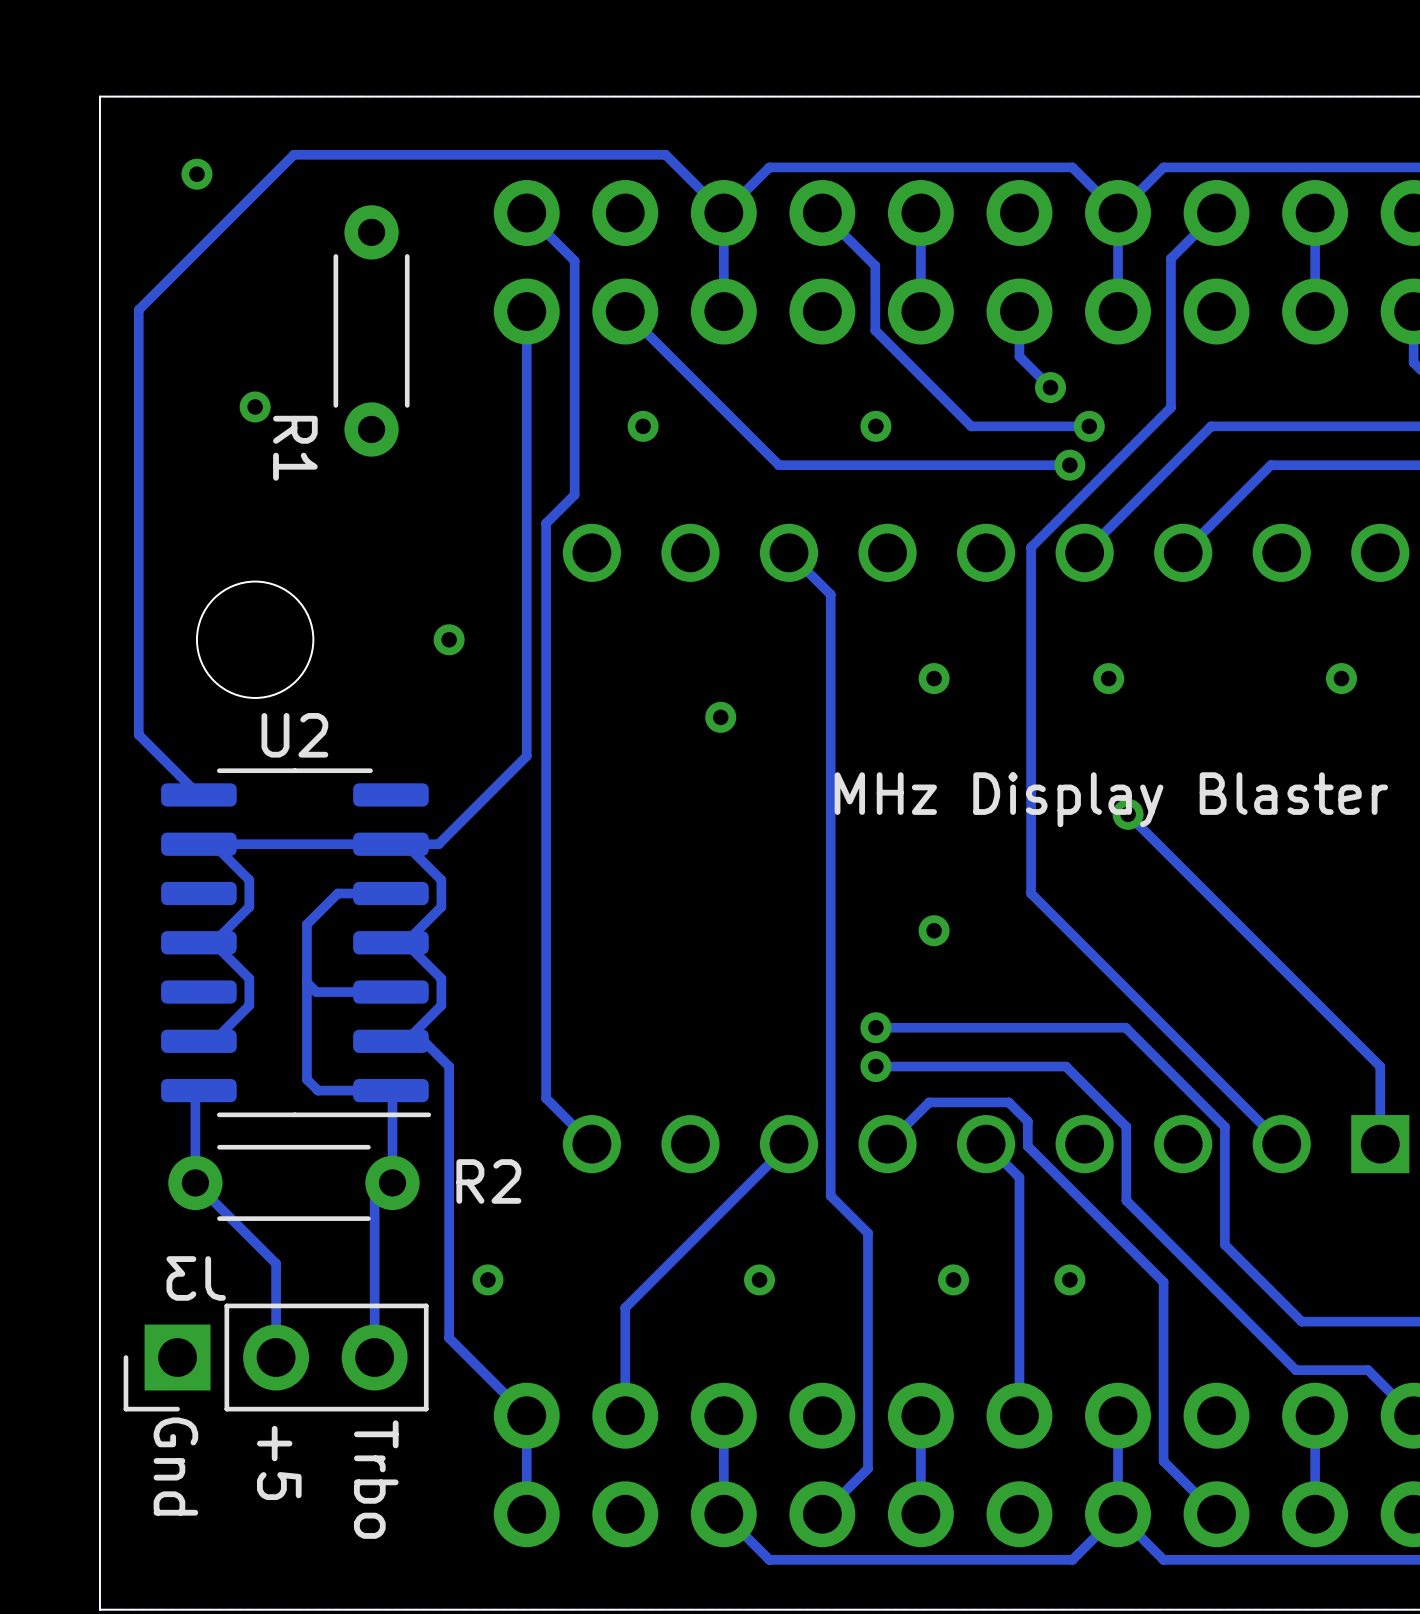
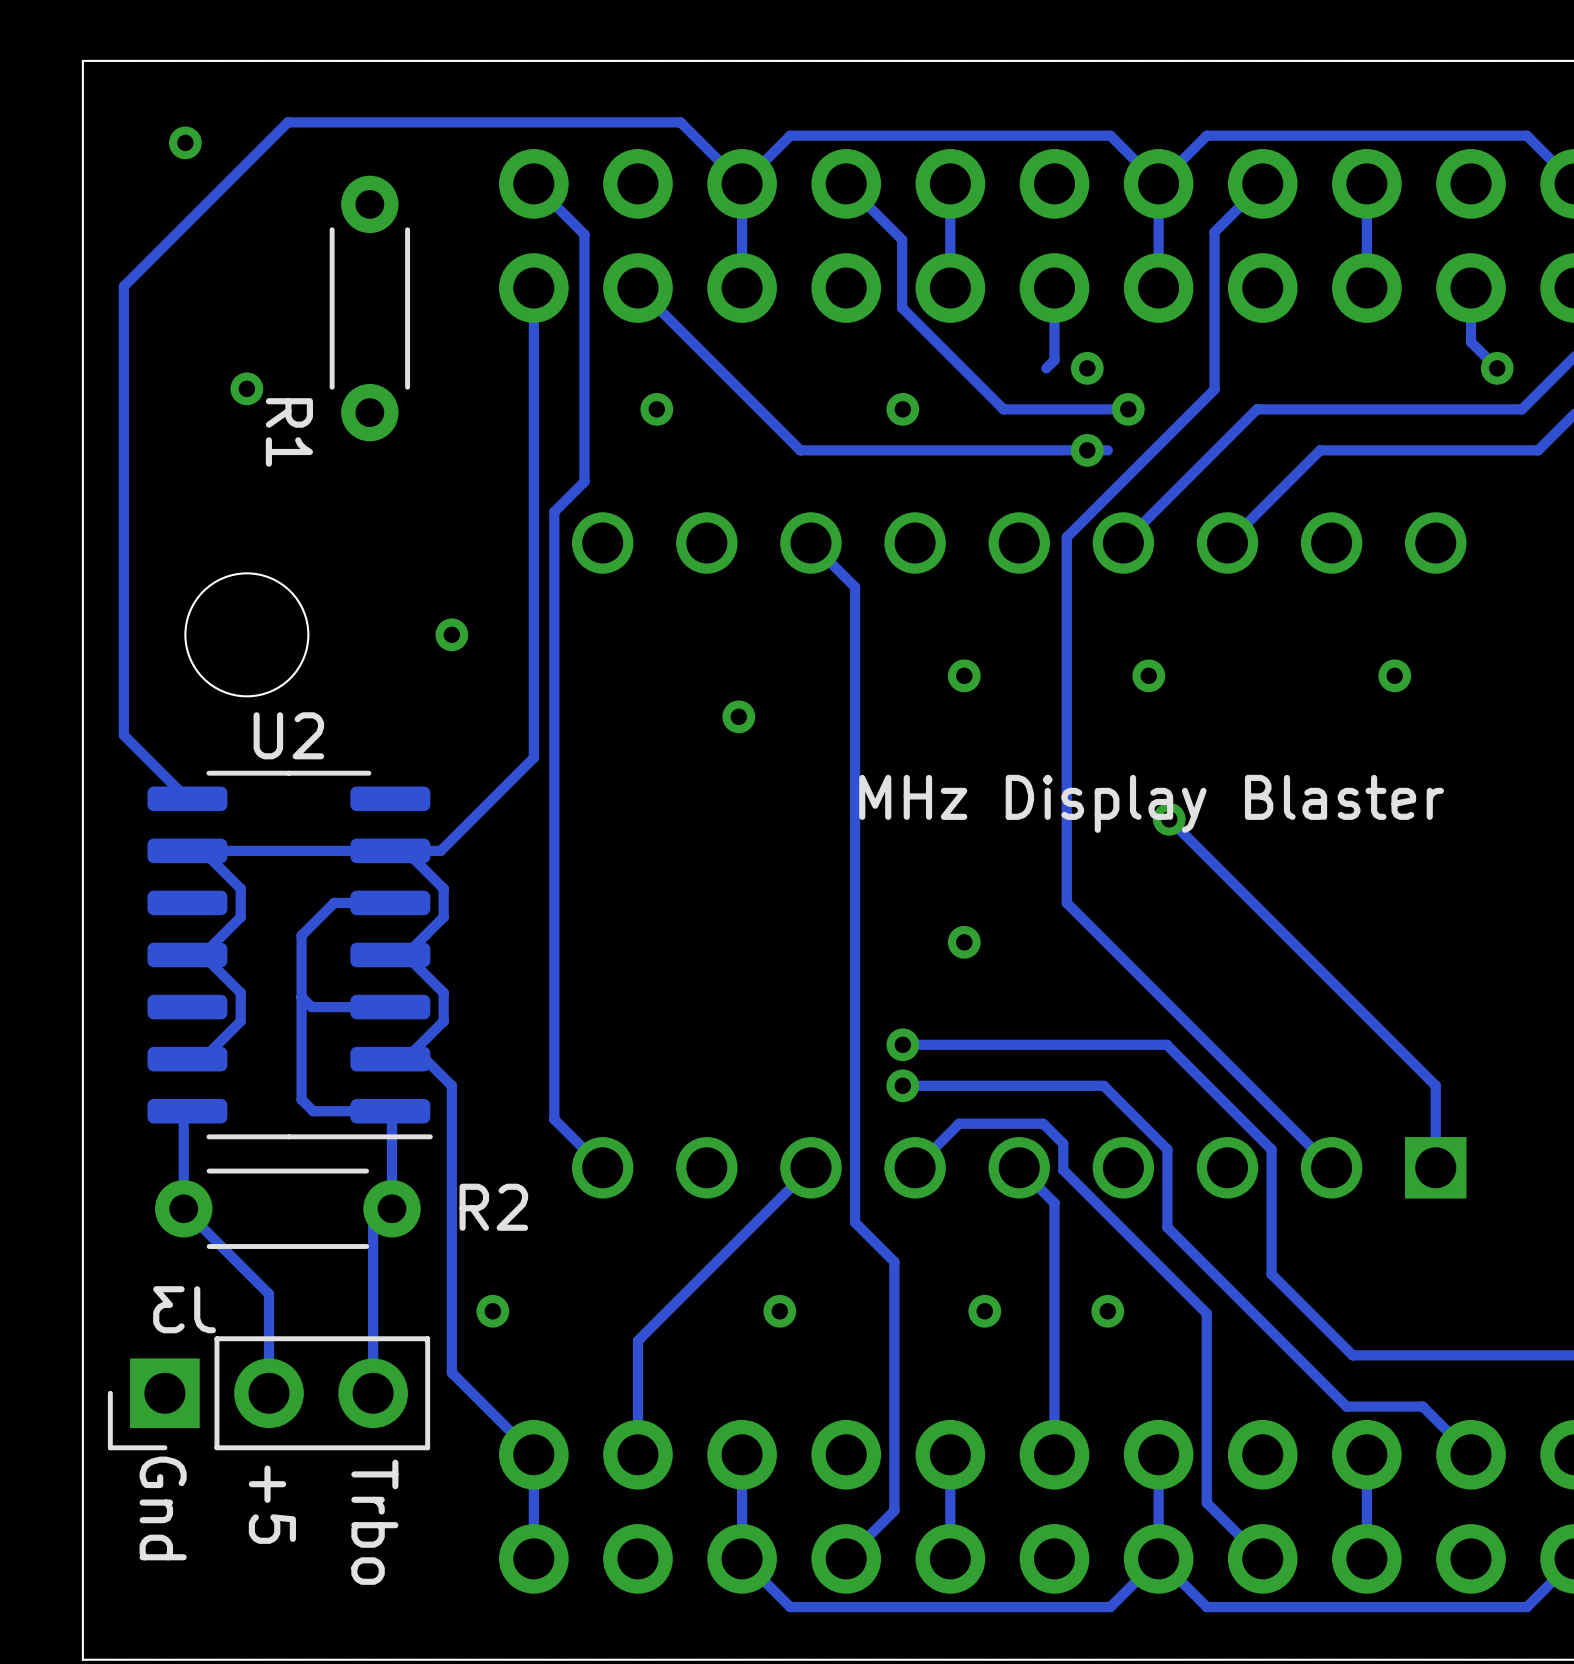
track: (1019, 356) (1050, 387) -> (1054, 335) (1054, 360) (1046, 368)
via position: (1069, 465) -> (1087, 450)

